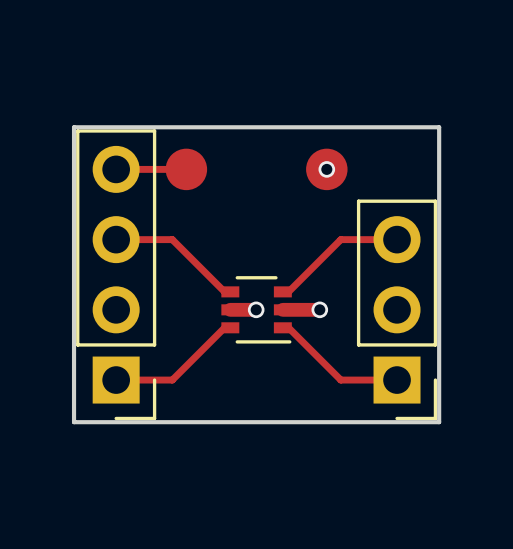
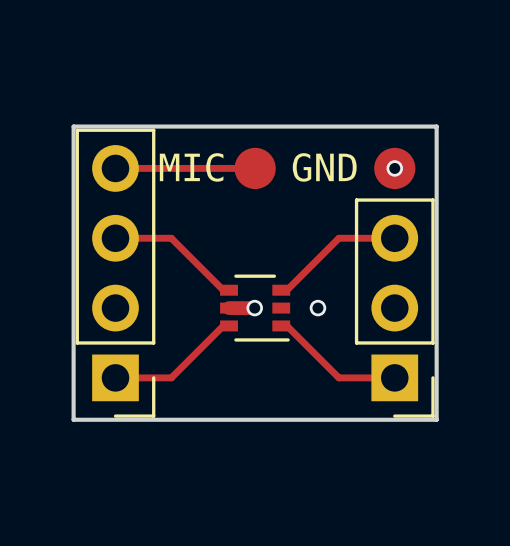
track: none -> (185, 168) (262, 168)
part: (186, 169) -> none
part: none -> MIC (255, 168)
part: (326, 169) -> none
via position: (326, 169) -> (394, 168)
part: none -> GND (394, 168)
track: (282, 309) (319, 309) -> none

